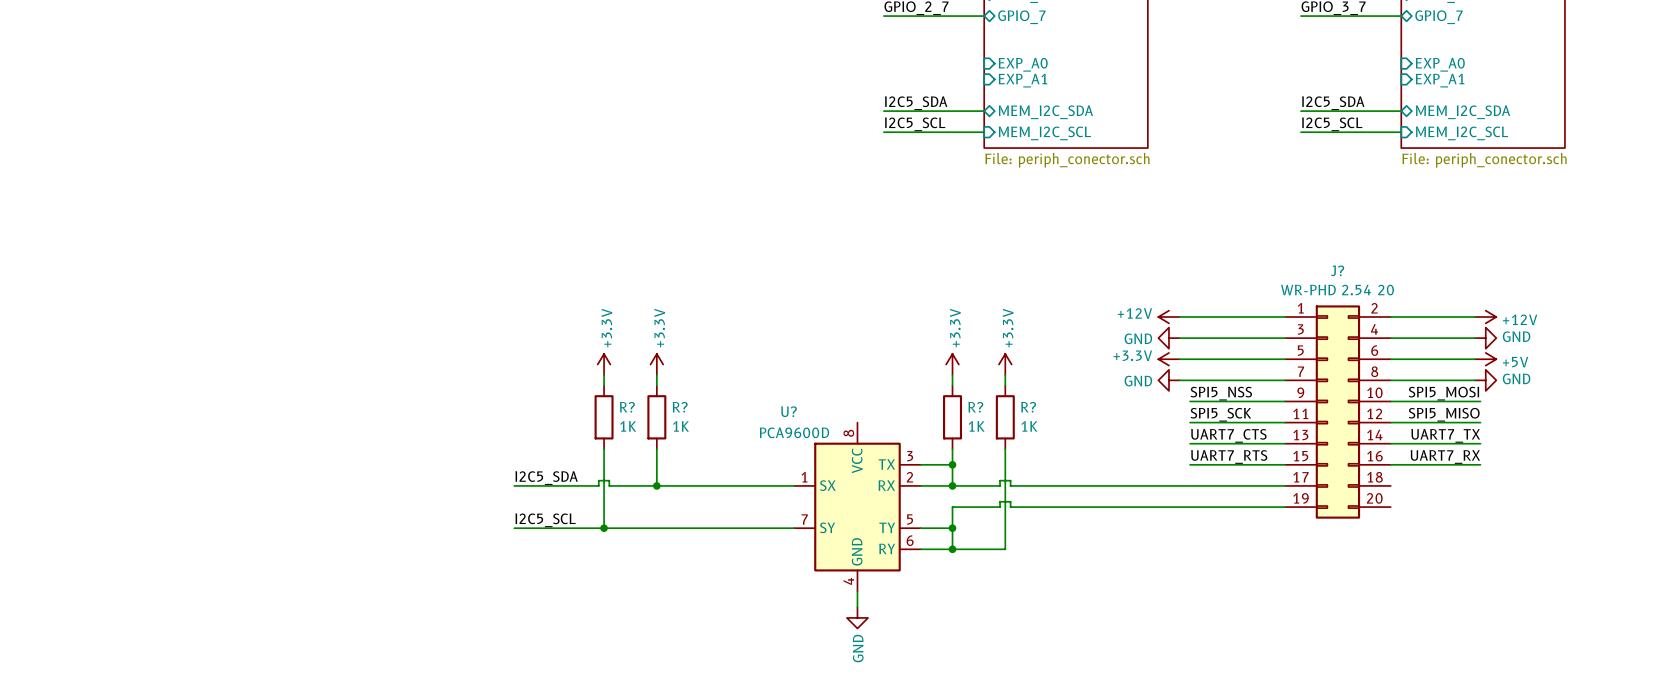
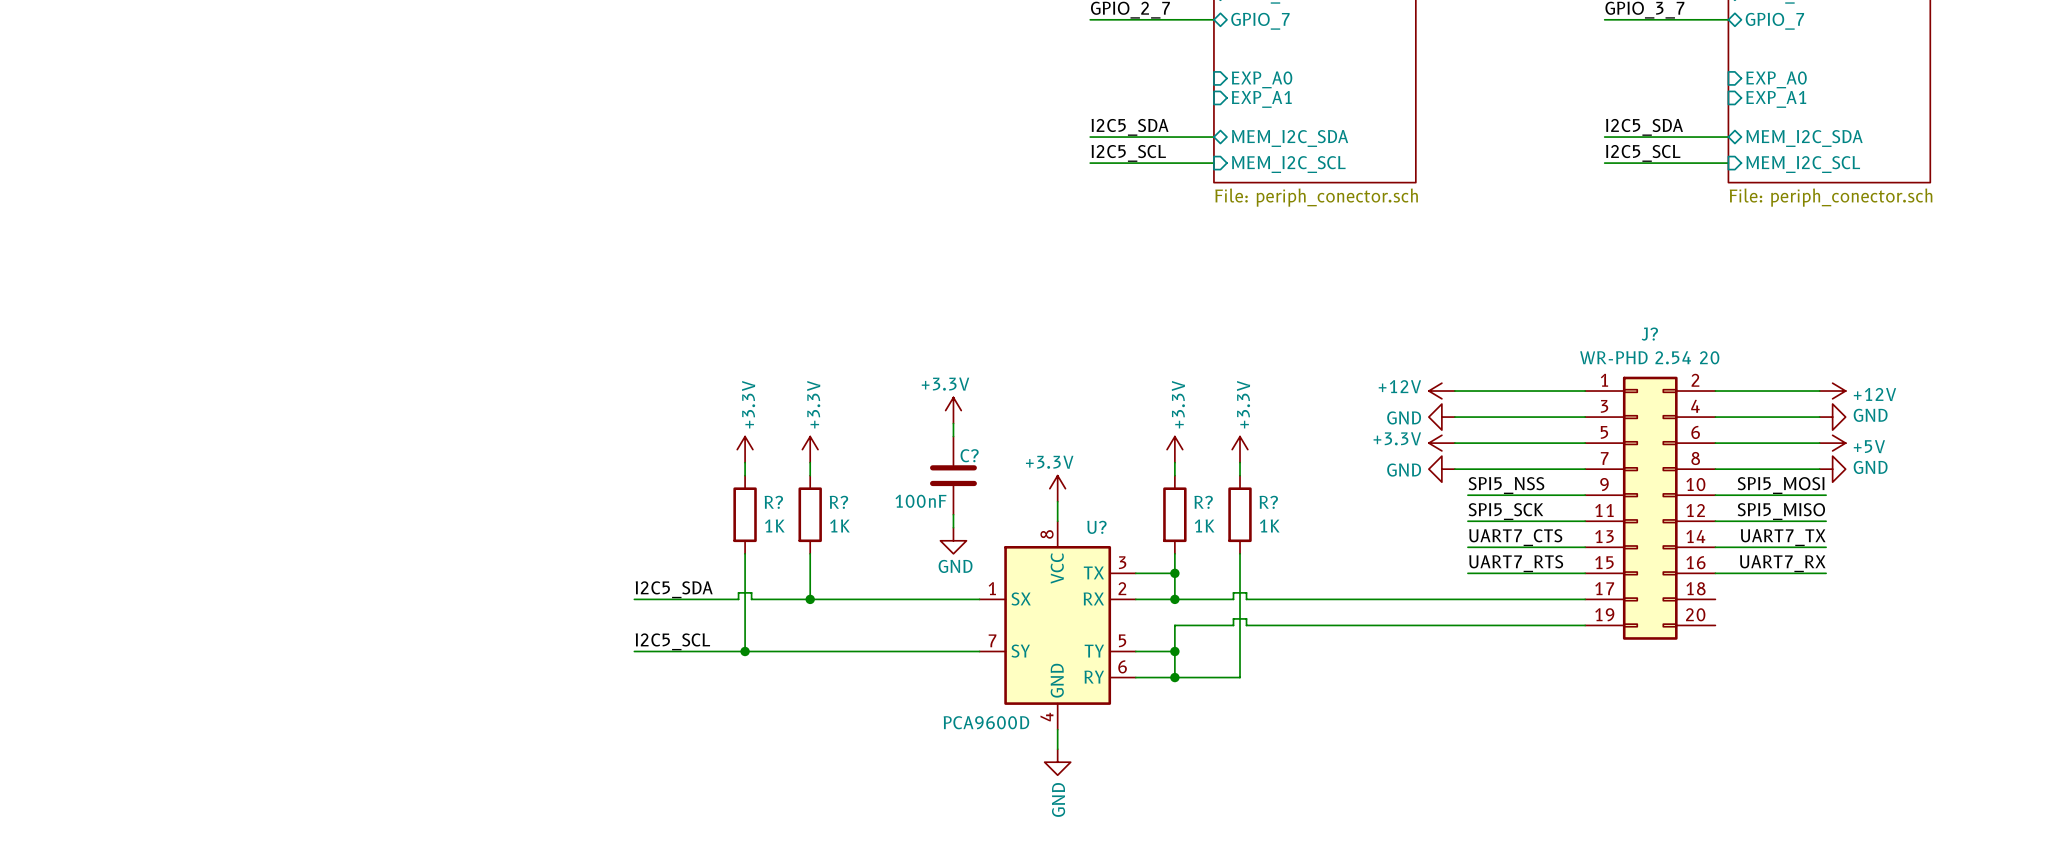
power symbol: none -> +3.3V (953, 410)
wire: none -> (953, 423) (953, 436)
C?: none -> 100nF (953, 475)
power symbol: none -> +3.3V (1057, 488)
wire: none -> (1057, 501) (1057, 521)
U? name position: U? (789, 411) -> U? (1096, 527)
wire: none -> (953, 514) (953, 527)
U? value position: PCA9600D (794, 432) -> PCA9600D (986, 722)
power symbol: none -> GND (953, 540)

